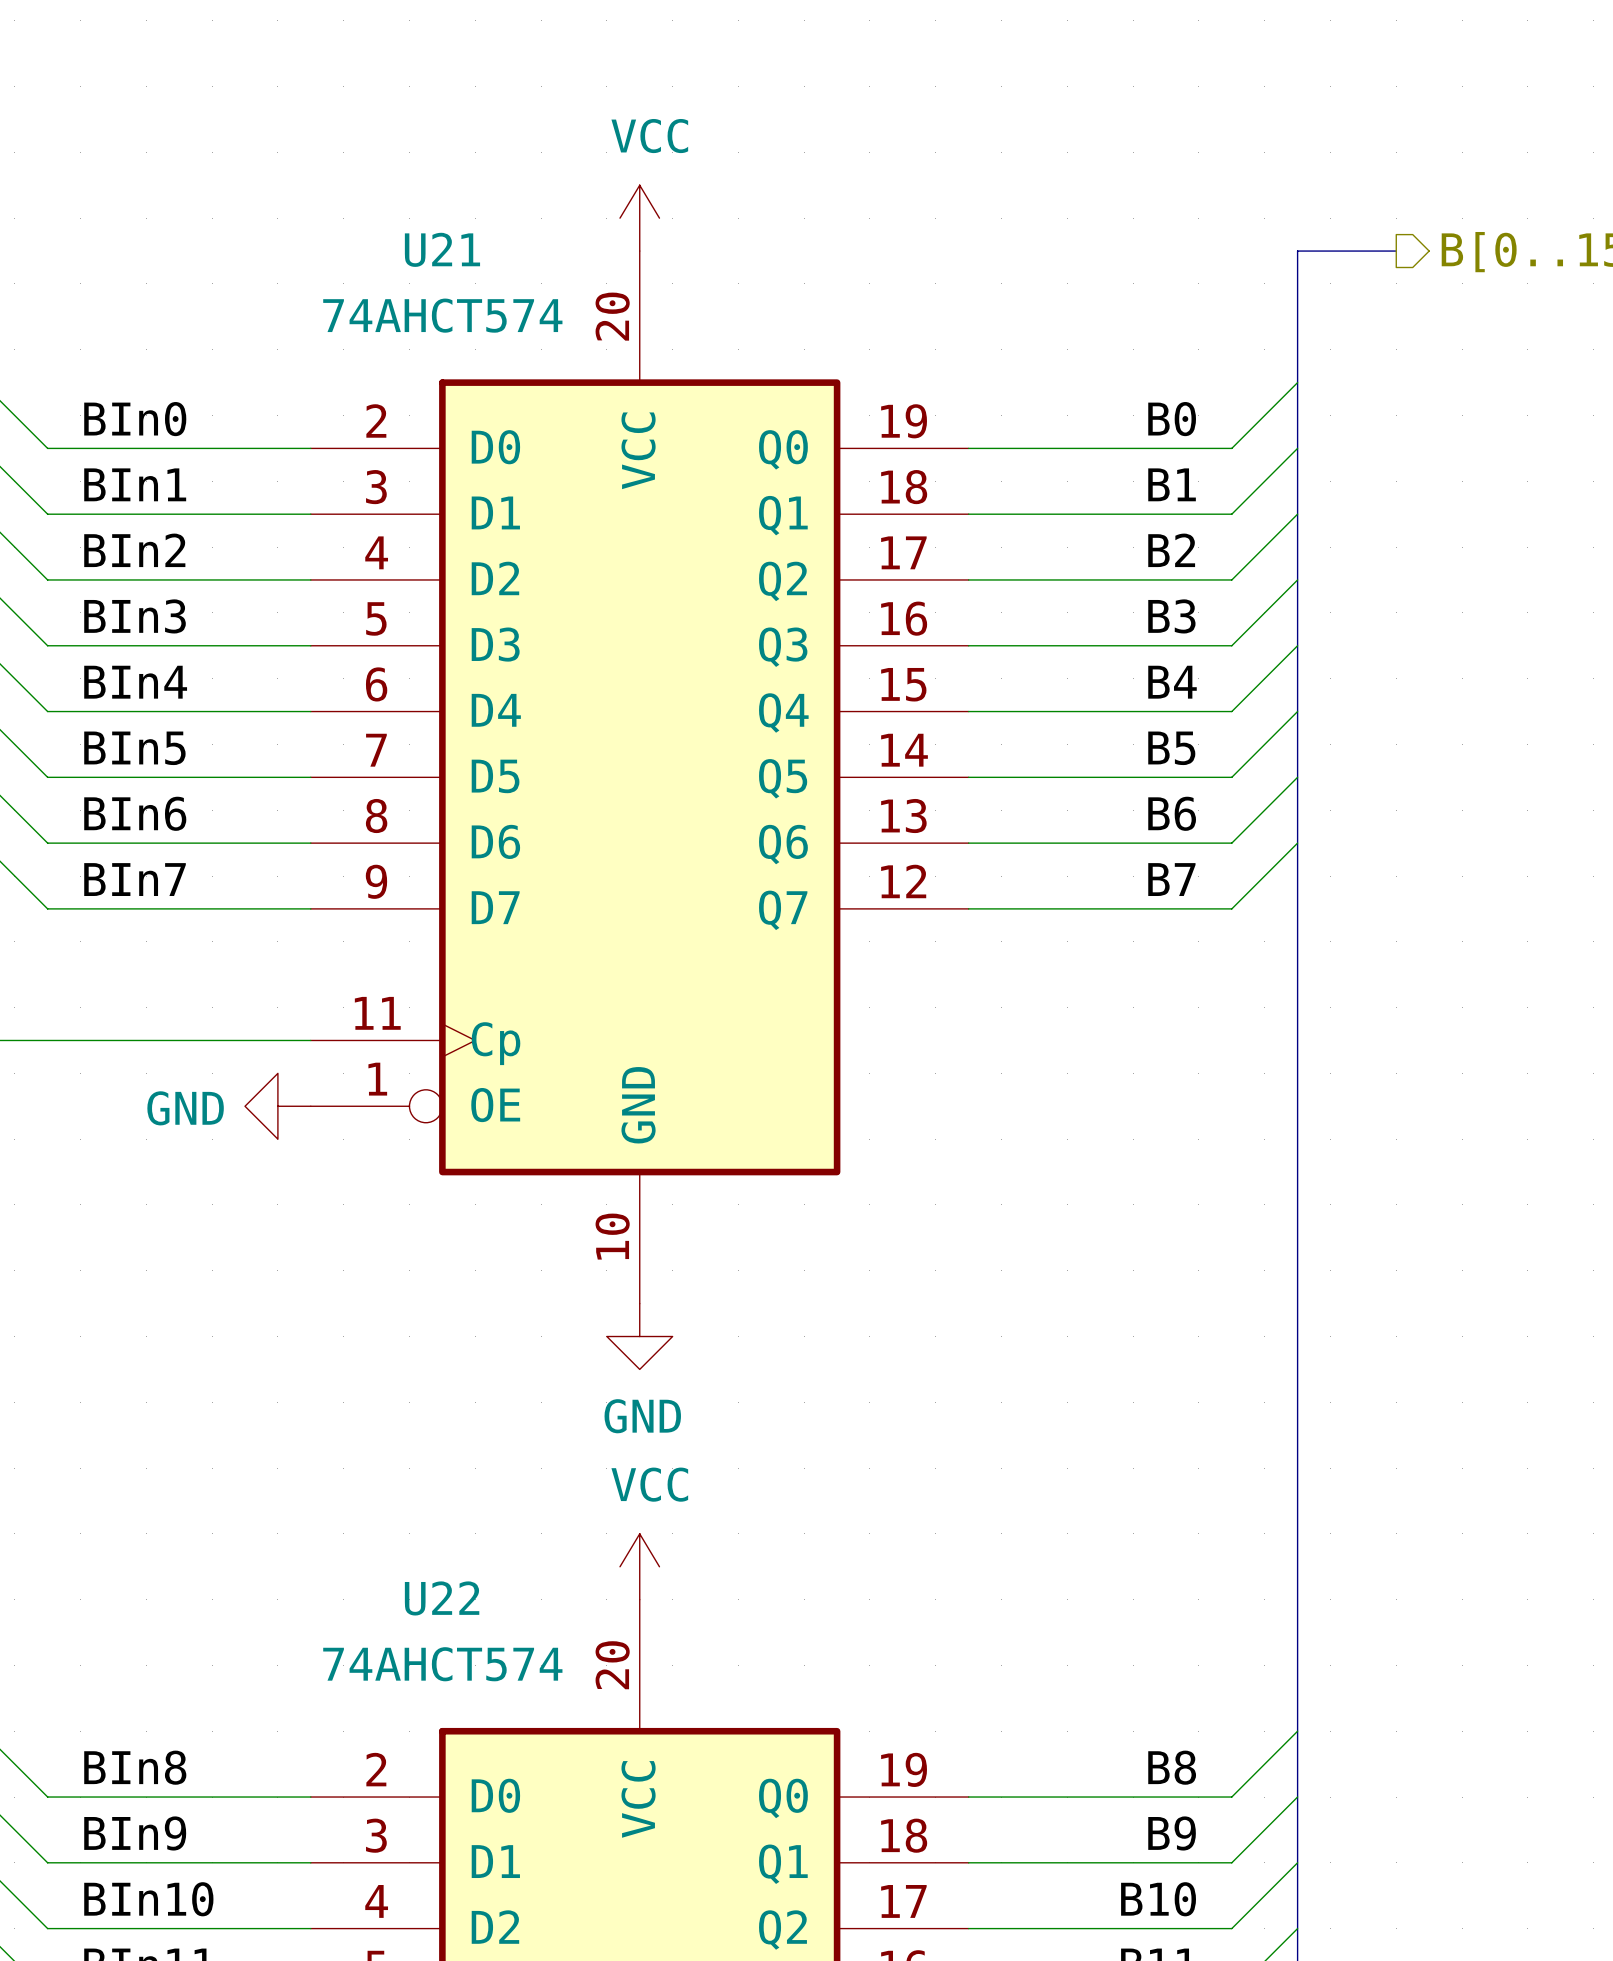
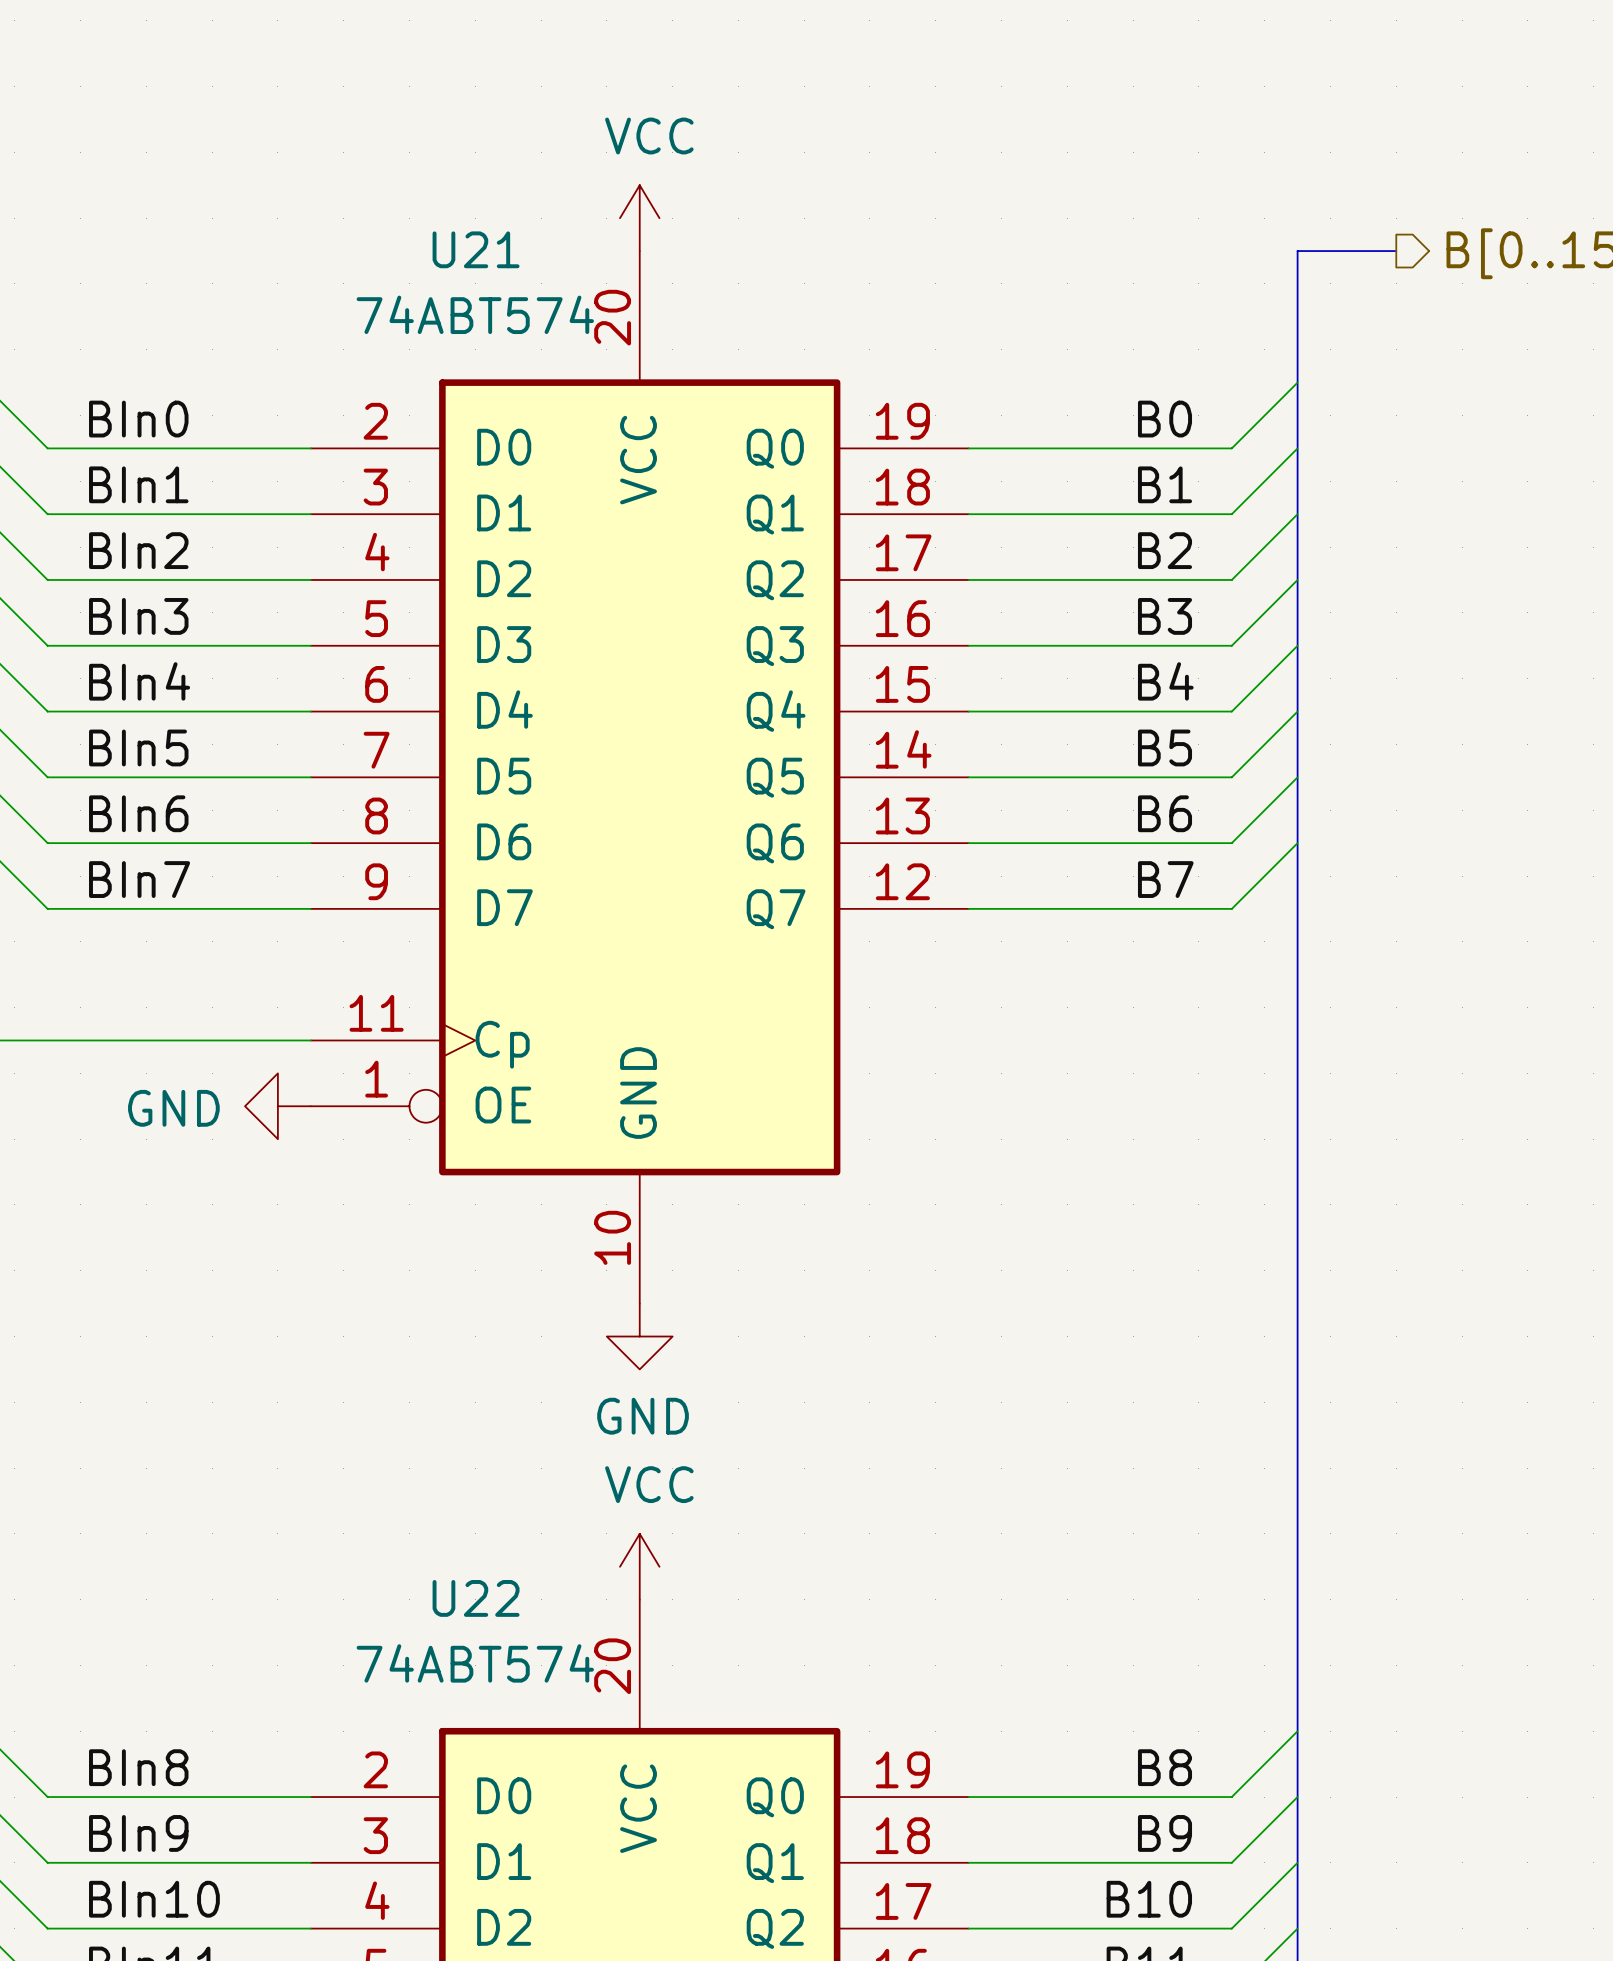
U21 name position: U21 (442, 249) -> U21 (476, 249)
U21 value: 74AHCT574 (442, 315) -> 74ABT574 (475, 314)
U22 name position: U22 (442, 1598) -> U22 (476, 1598)
U22 value: 74AHCT574 (442, 1664) -> 74ABT574 (475, 1663)

